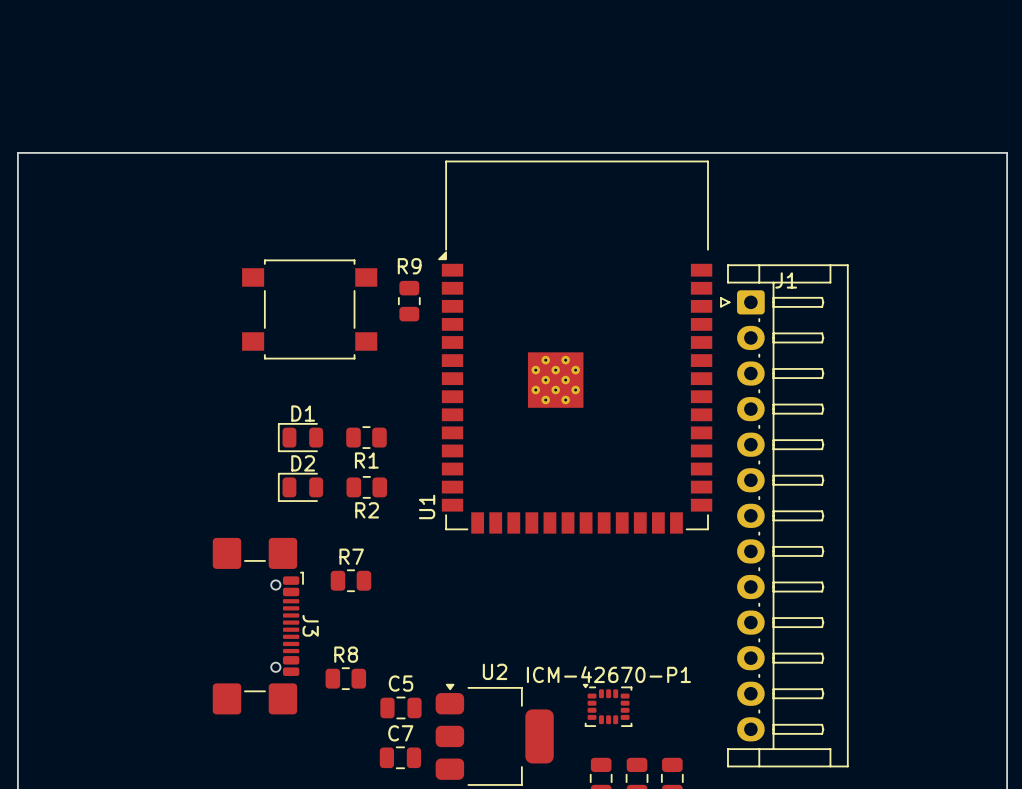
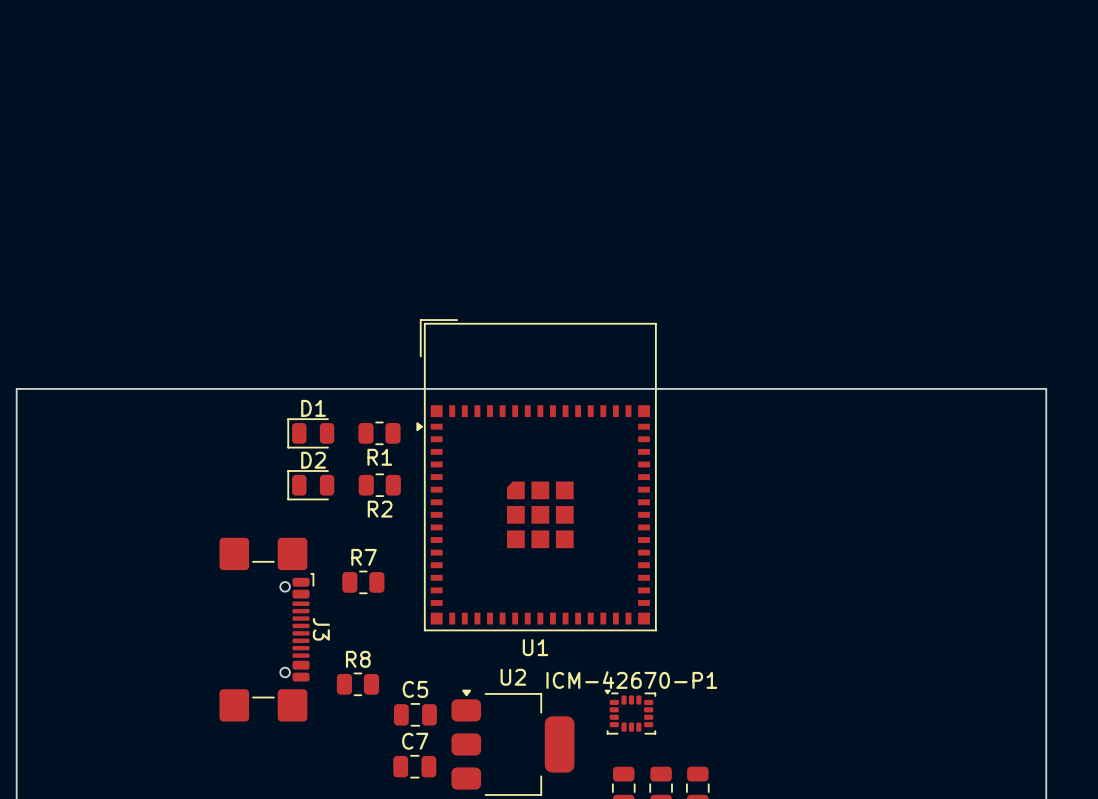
U1 footprint: [438, 160, 713, 534] -> [416, 319, 657, 632]
R9: (409, 301) -> none
part: (309, 309) -> none
board edge: (17, 394) (17, 152) (1007, 152) (1007, 394) -> (16, 388) (1046, 388)
U1 name position: U1 (427, 506) -> U1 (535, 647)
J1: (784, 515) -> none

